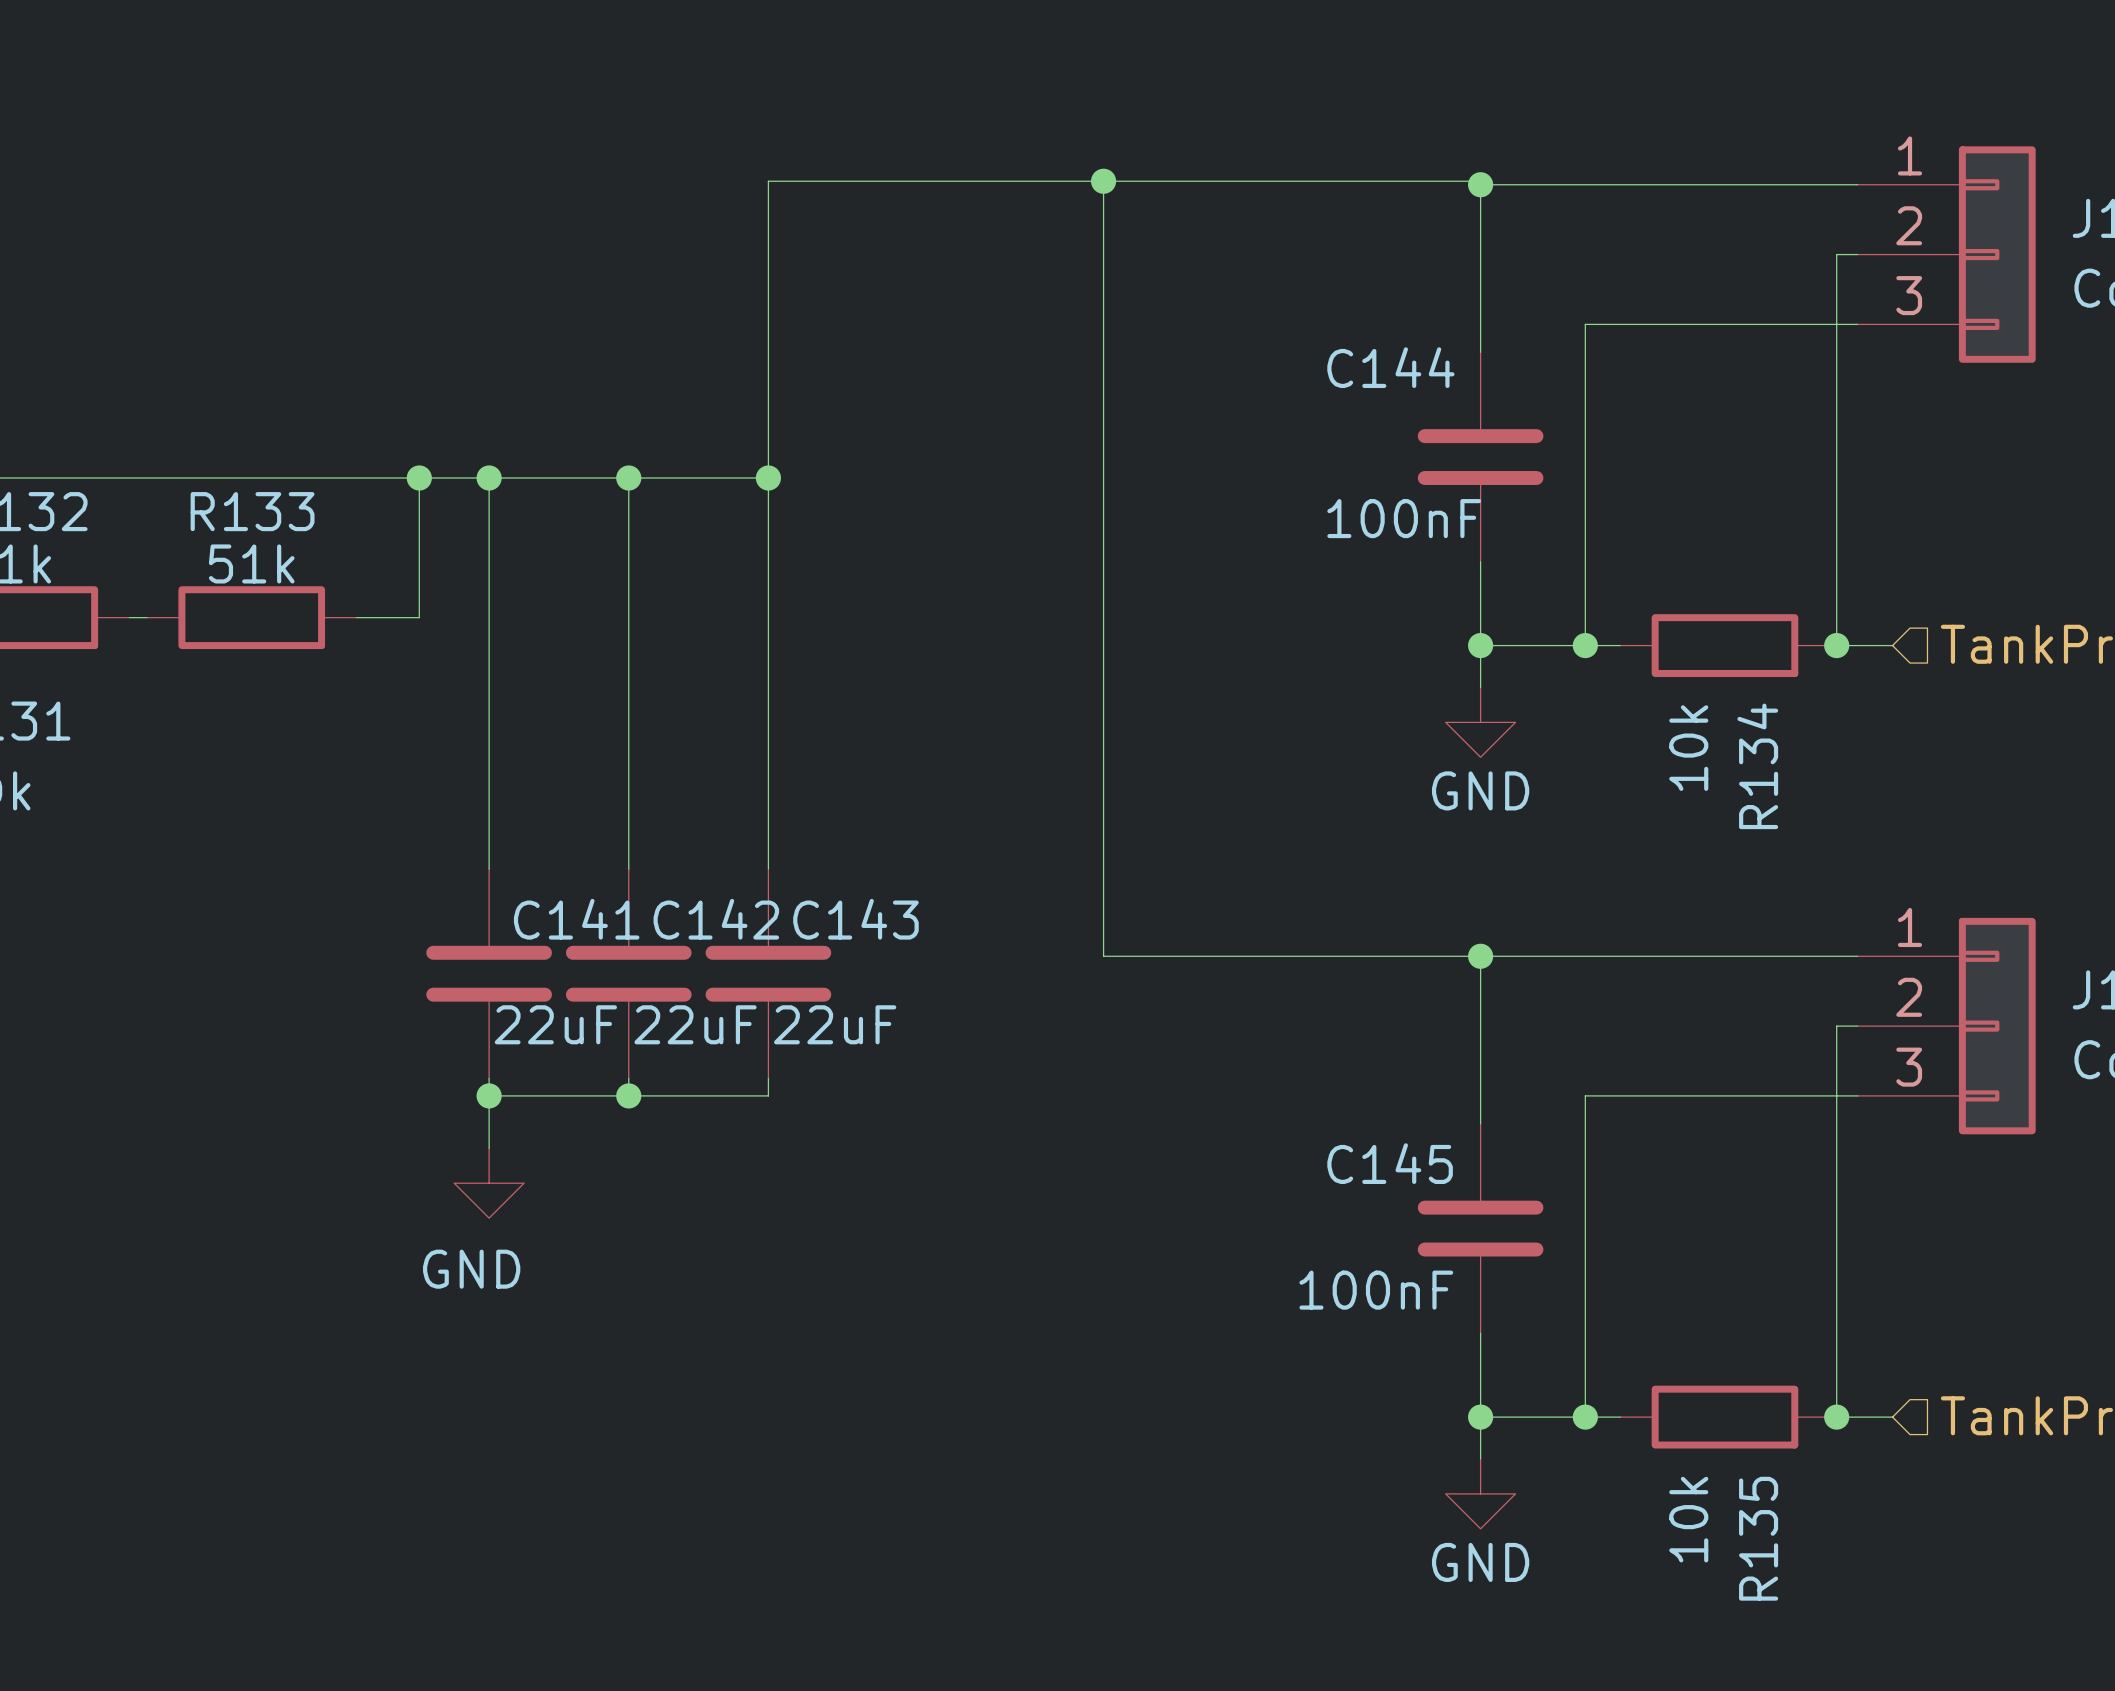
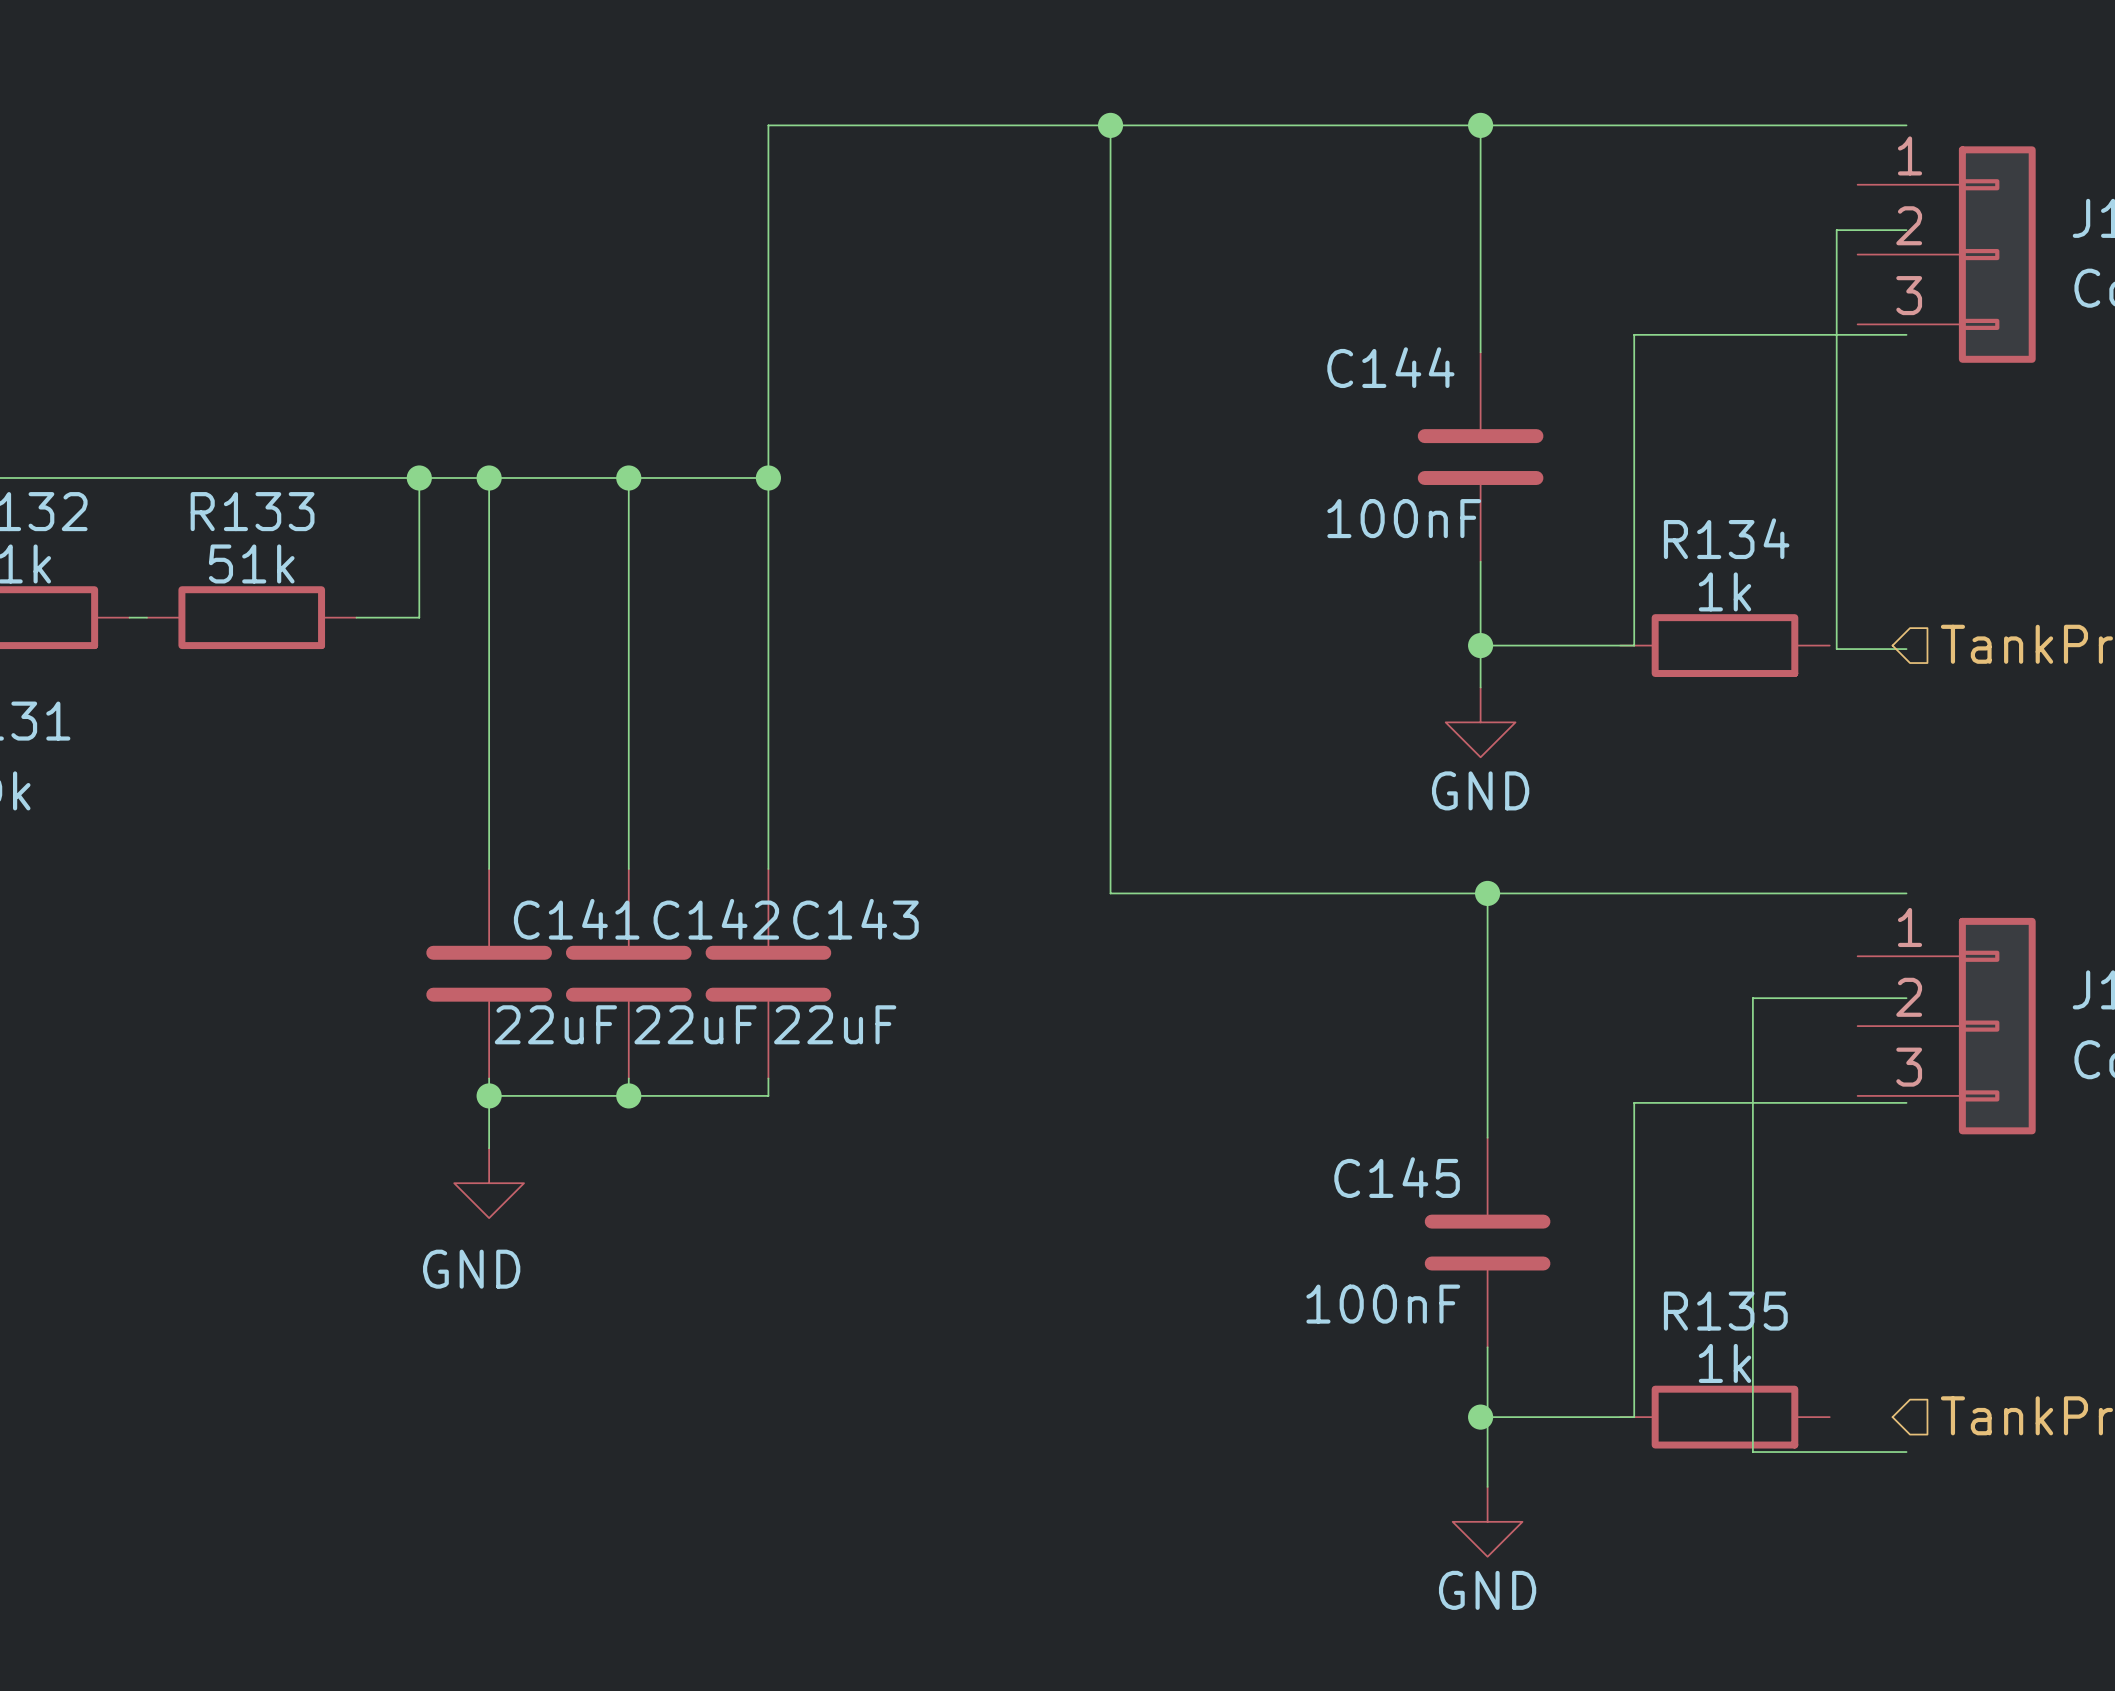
wire: none -> (1110, 125) (1110, 893) (1906, 893)
wire: none -> (1480, 125) (1480, 181)
wire: (768, 181) (1480, 181) -> (768, 181) (768, 125) (1906, 125)
wire: (1103, 181) (1103, 956) (1857, 956) -> none
junction position: (1103, 181) -> (1110, 125)
wire: (1480, 184) (1857, 184) -> none
junction position: (1480, 184) -> (1480, 125)
wire: (1836, 254) (1857, 254) -> (1836, 254) (1836, 230) (1906, 230)
wire: (1857, 324) (1585, 324) (1585, 645) -> none
wire: none -> (1906, 334) (1634, 334) (1634, 645) (1620, 645)
junction: (1585, 645) -> none
wire: (1829, 645) (1892, 645) -> none
wire: none -> (1836, 645) (1836, 649) (1906, 649)
junction: (1836, 645) -> none
R134 value: 10k (1688, 748) -> 1k (1724, 591)
R134 name rotation: 0° (1757, 766) -> 90° clockwise (1726, 538)
R134 name position: R134 (1757, 766) -> R134 (1726, 538)
wire: none -> (1487, 893) (1487, 1137)
wire: (1480, 956) (1480, 1123) -> none
junction position: (1480, 956) -> (1487, 893)
wire: none -> (1906, 998) (1752, 998) (1752, 1452) (1906, 1452)
wire: (1857, 1026) (1836, 1026) (1836, 1417) -> none
wire: (1857, 1095) (1585, 1095) (1585, 1417) -> none
wire: none -> (1906, 1102) (1634, 1102) (1634, 1417) (1620, 1417)
C145 position: (1480, 1228) -> (1487, 1242)
wire: (1480, 1333) (1480, 1459) -> none
wire: none -> (1487, 1347) (1487, 1486)
junction: (1585, 1417) -> none
wire: (1829, 1417) (1892, 1417) -> none
junction: (1836, 1417) -> none
power symbol position: GND (1480, 1493) -> GND (1487, 1521)
R135 value: 10k (1688, 1519) -> 1k (1724, 1363)
R135 name rotation: 0° (1758, 1538) -> 90° clockwise (1725, 1311)
R135 name position: R135 (1758, 1538) -> R135 (1725, 1311)

